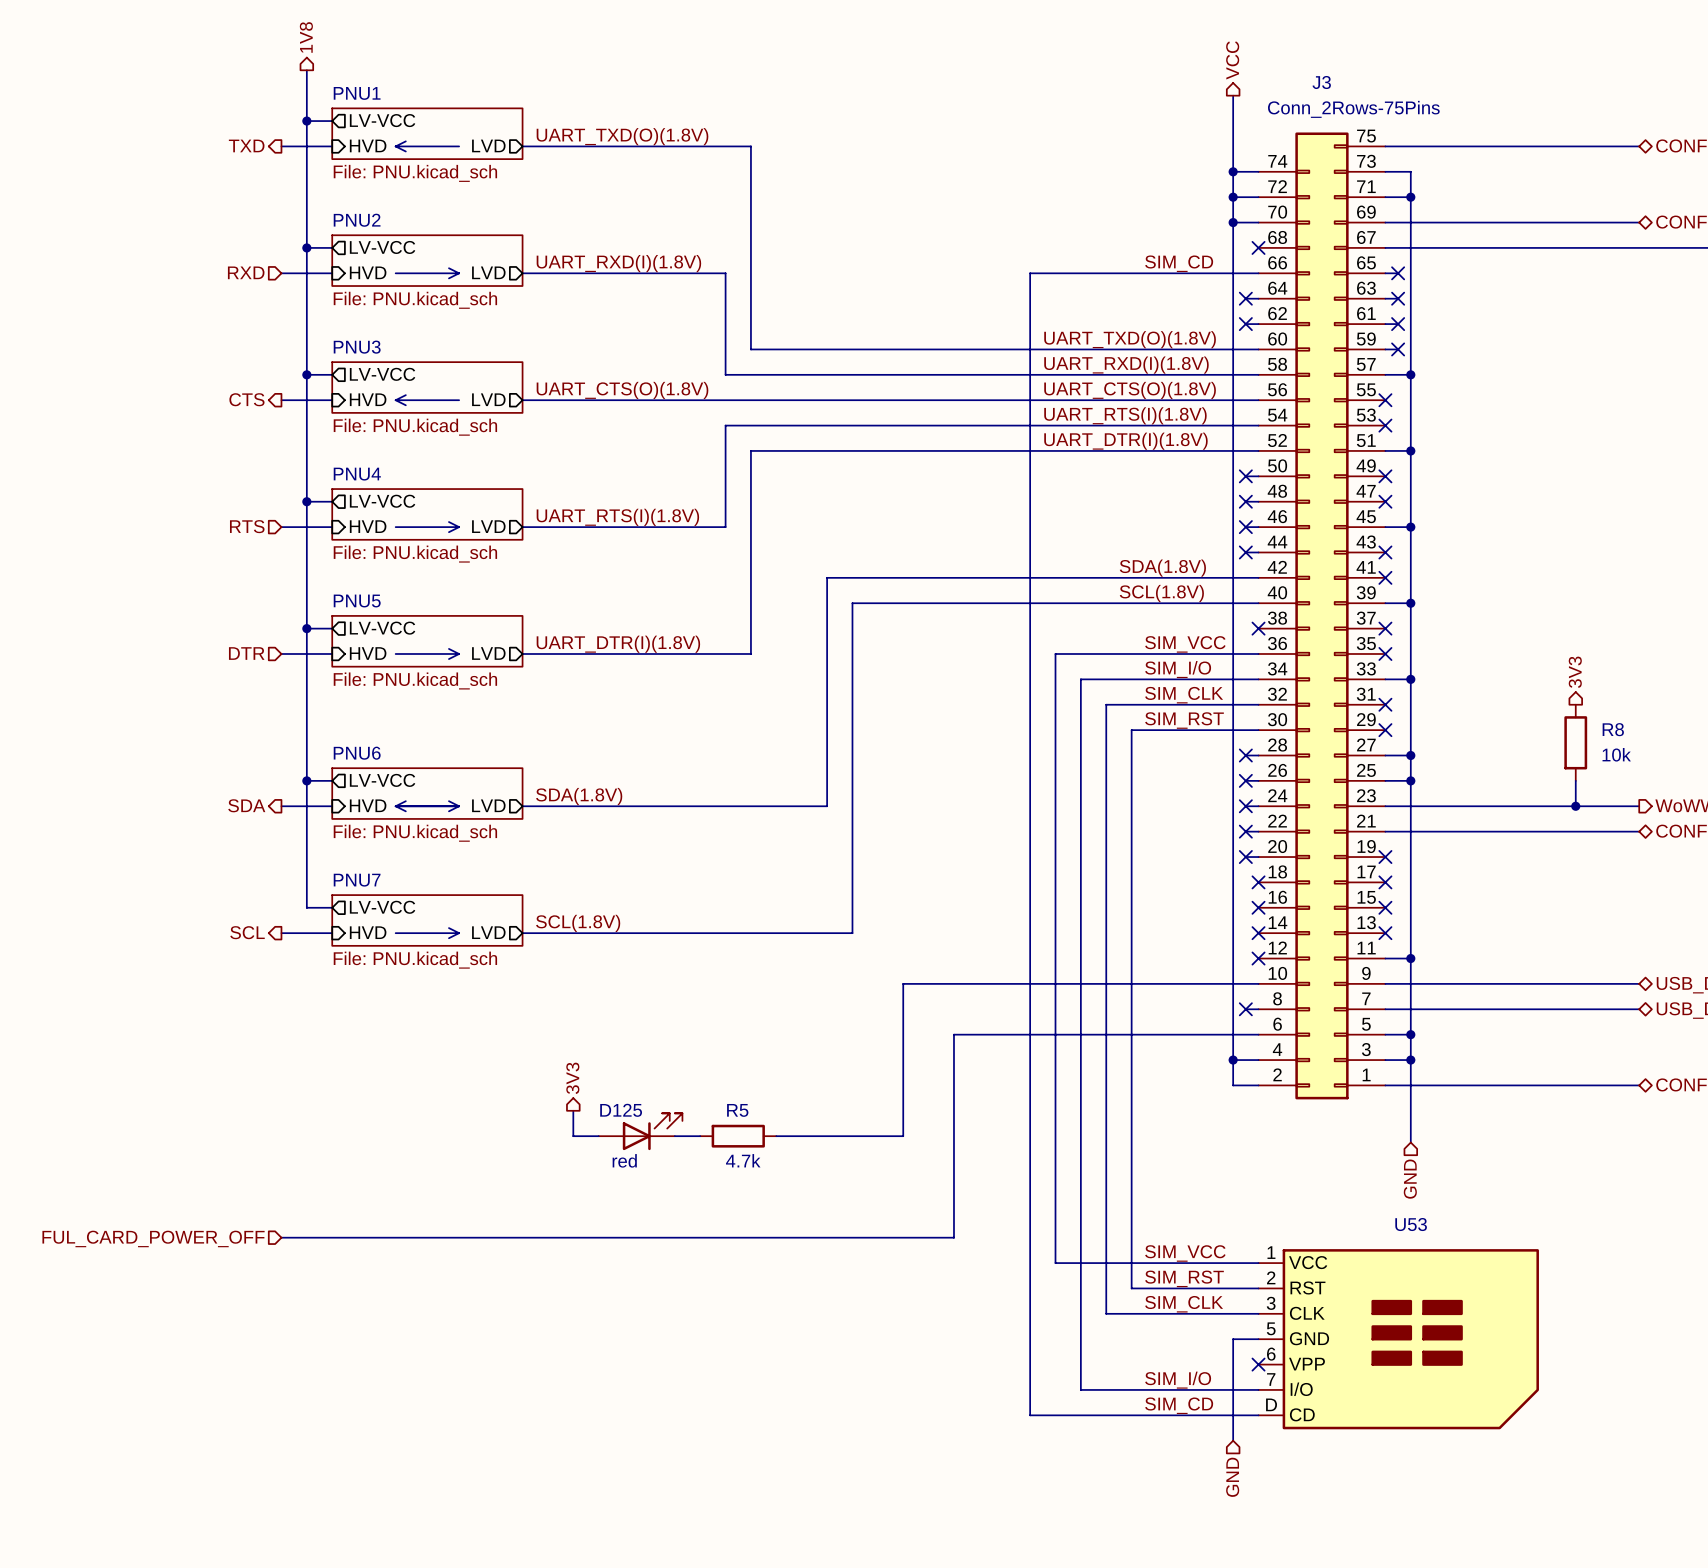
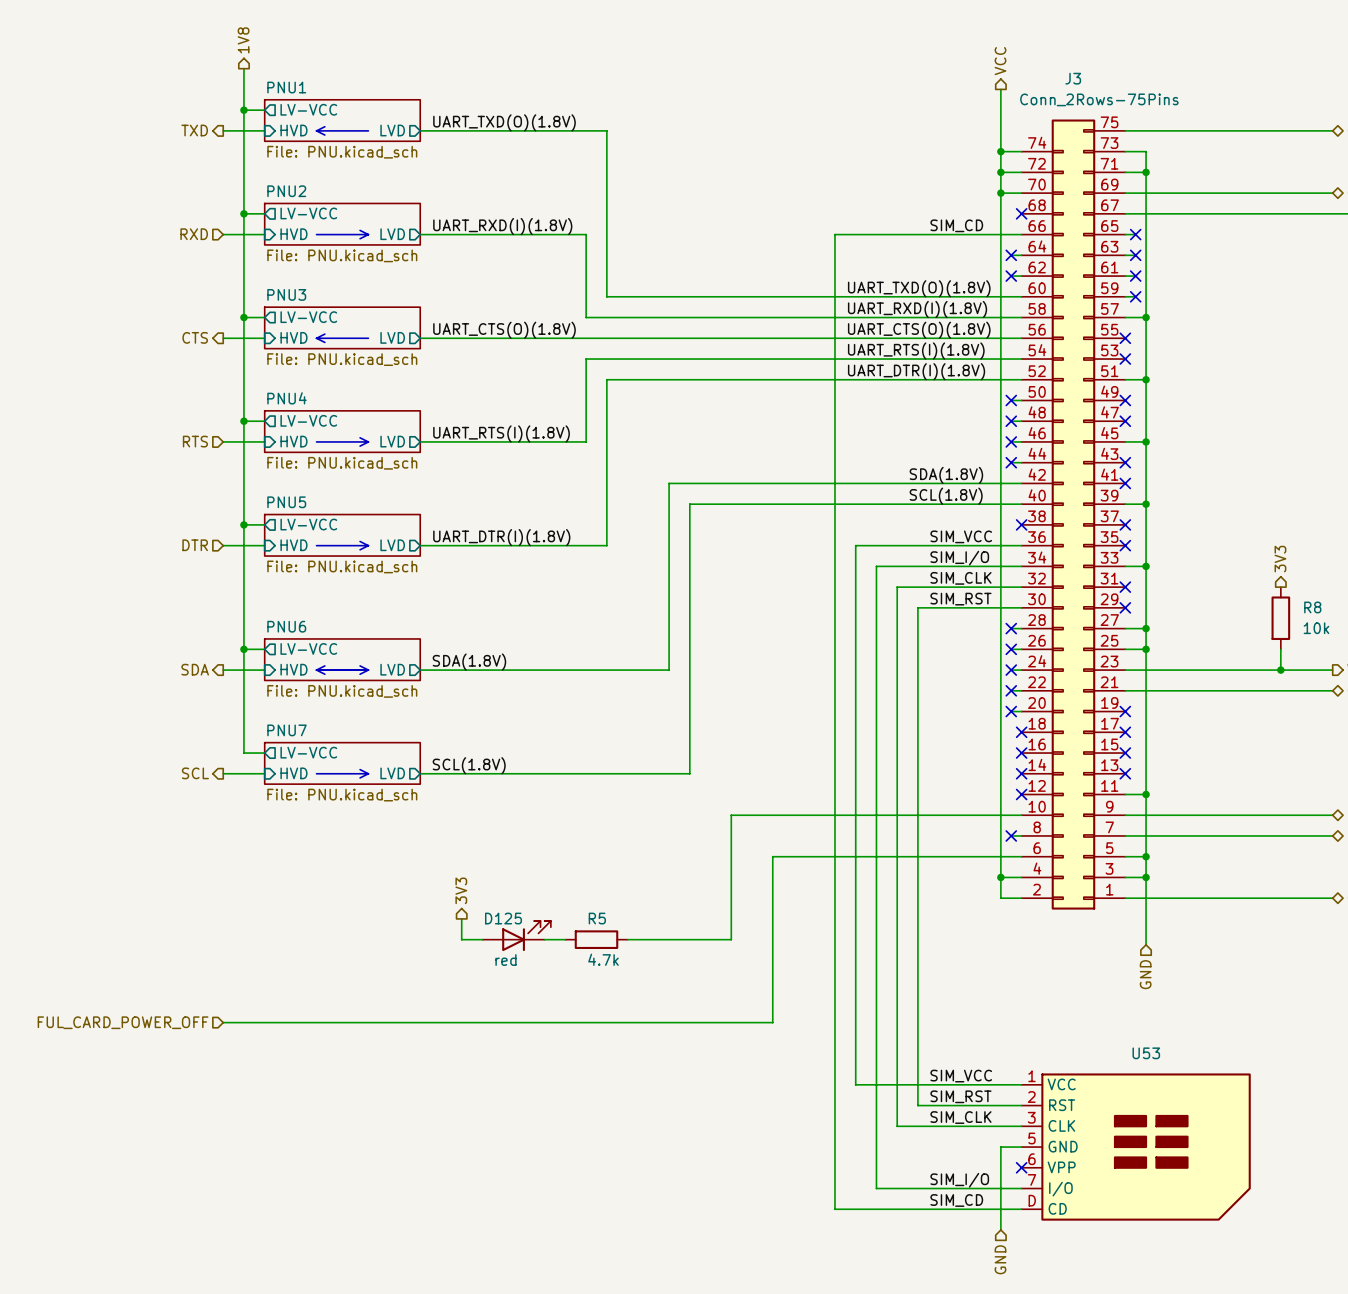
label: SIM_VCC (1185, 1253) -> none
wire: (1055, 1263) (1258, 1263) -> (855, 1043) (855, 1084) (897, 1084) (897, 1126) (1021, 1126)
label position: SIM_RST (1184, 1278) -> SIM_RST (960, 1096)
wire: (1131, 1288) (1258, 1288) -> (917, 1064) (917, 1105) (1000, 1105)
label: SIM_CLK (1184, 1304) -> SIM_VCC (961, 1076)
wire: (1233, 1339) (1233, 1389) (1080, 1389) -> (1021, 1188) (876, 1188) (876, 1147)
U53 position: (1398, 1339) -> (1136, 1147)
label: none -> SIM_CLK (960, 1117)
no-connect mark position: (1258, 1364) -> (1021, 1167)
label position: SIM_I/O (1178, 1380) -> SIM_I/O (959, 1180)
label position: SIM_CD (1179, 1405) -> SIM_CD (956, 1200)
wire: (1030, 1415) (1258, 1415) -> (834, 1167) (834, 1209) (1021, 1209)
wire: none -> (1000, 1188) (1000, 1229)
hierarchical label position: GND (1232, 1477) -> GND (1000, 1259)

